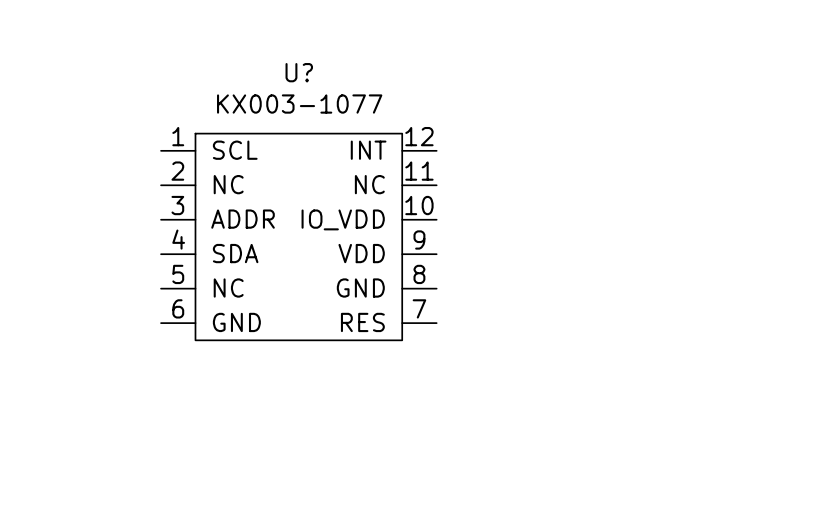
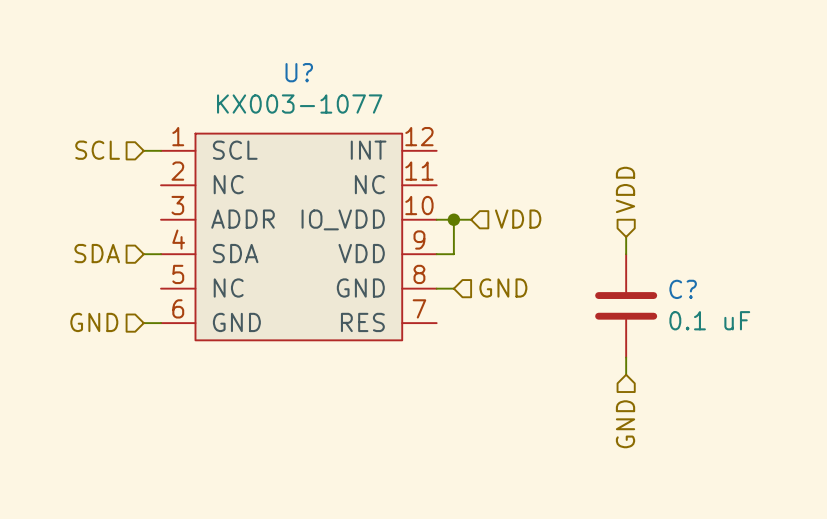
hierarchical label: none -> SCL (97, 150)
wire: none -> (143, 150) (161, 150)
hierarchical label: none -> VDD (625, 189)
wire: none -> (436, 219) (471, 219)
wire: none -> (453, 219) (453, 254) (436, 254)
junction: none -> (453, 219)
hierarchical label: none -> VDD (518, 219)
wire: none -> (626, 236) (626, 254)
hierarchical label: none -> SDA (97, 253)
wire: none -> (143, 254) (161, 254)
wire: none -> (436, 288) (453, 288)
hierarchical label: none -> GND (503, 288)
C?: none -> 0.1 uF (626, 305)
hierarchical label: none -> GND (94, 322)
wire: none -> (143, 323) (161, 323)
wire: none -> (626, 357) (626, 374)
hierarchical label: none -> GND (625, 424)

